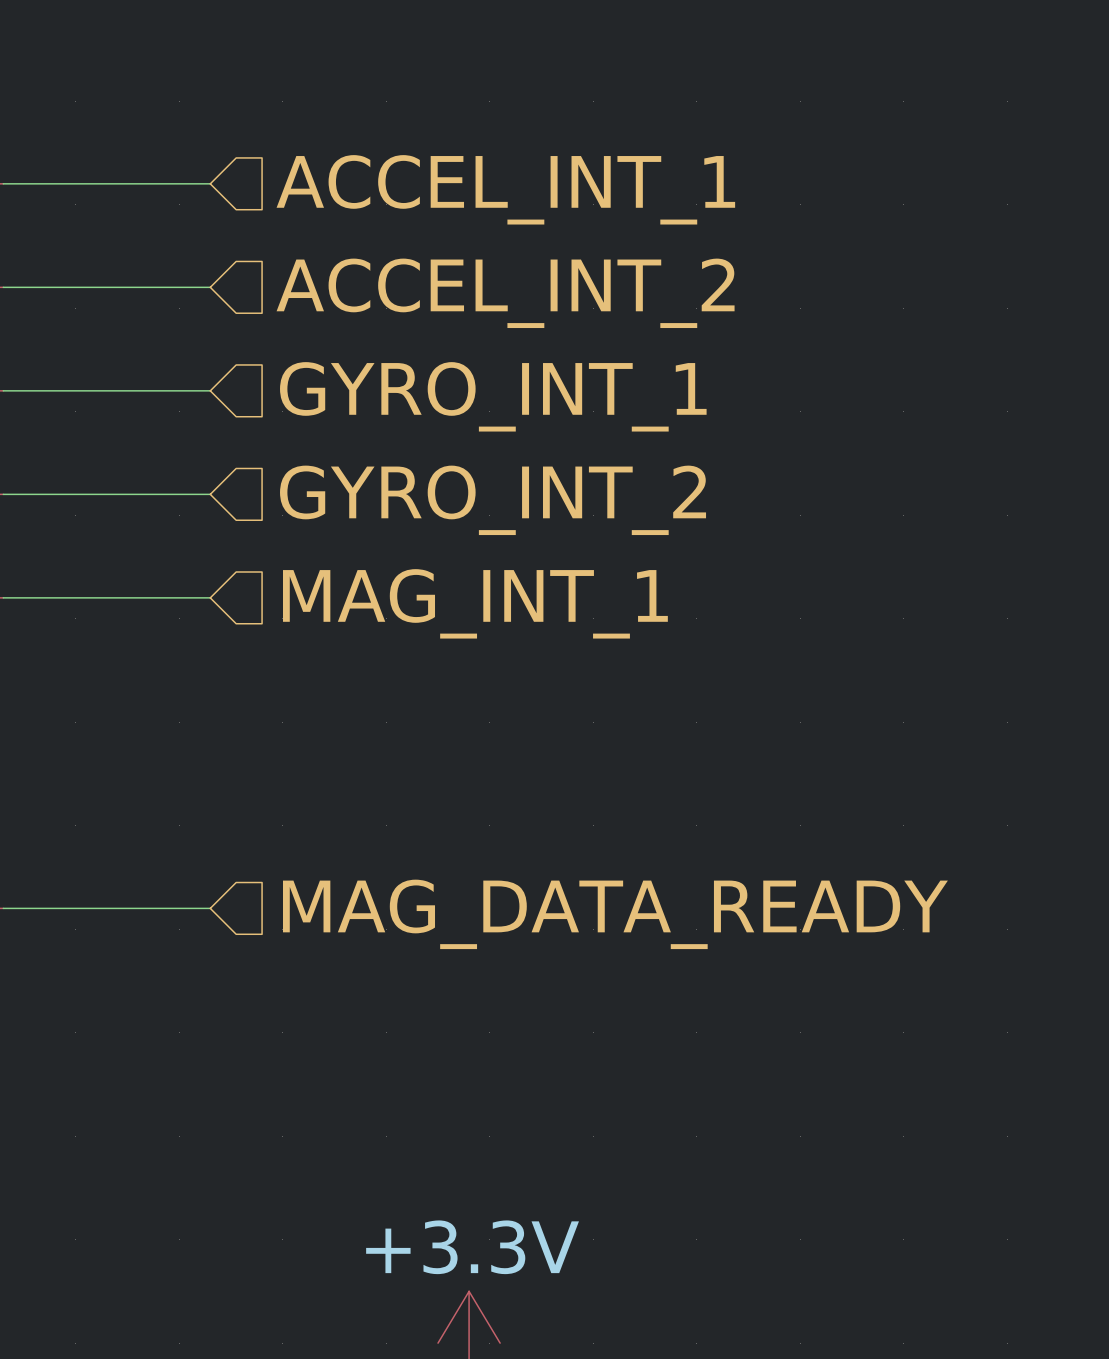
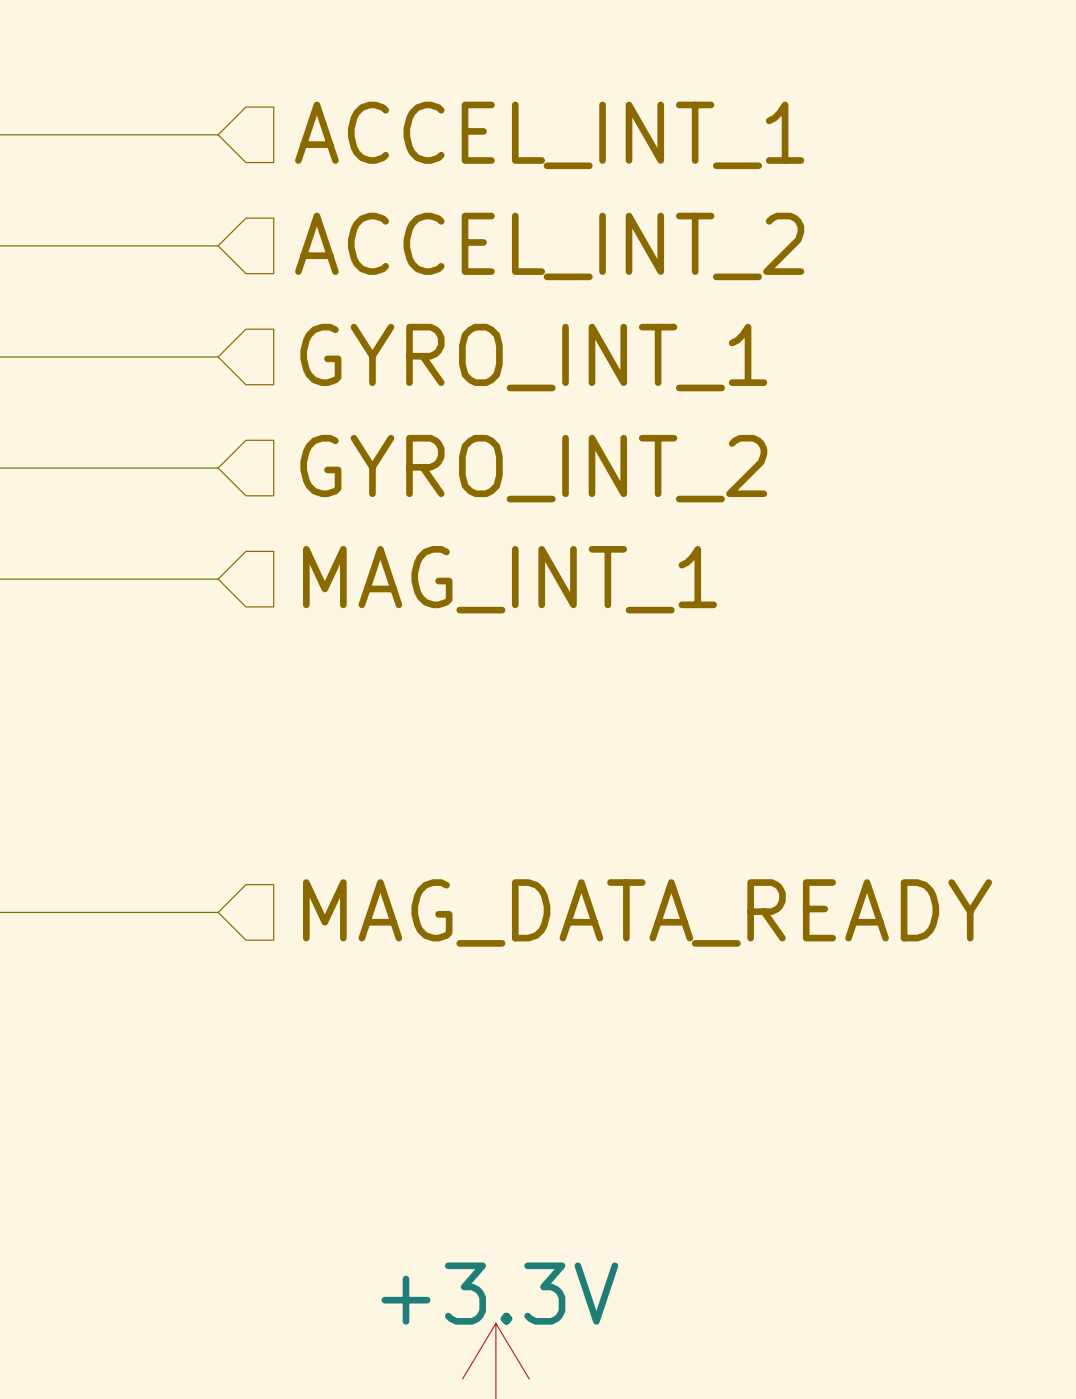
power symbol text position: +3.3V (472, 1247) -> +3.3V (499, 1293)

